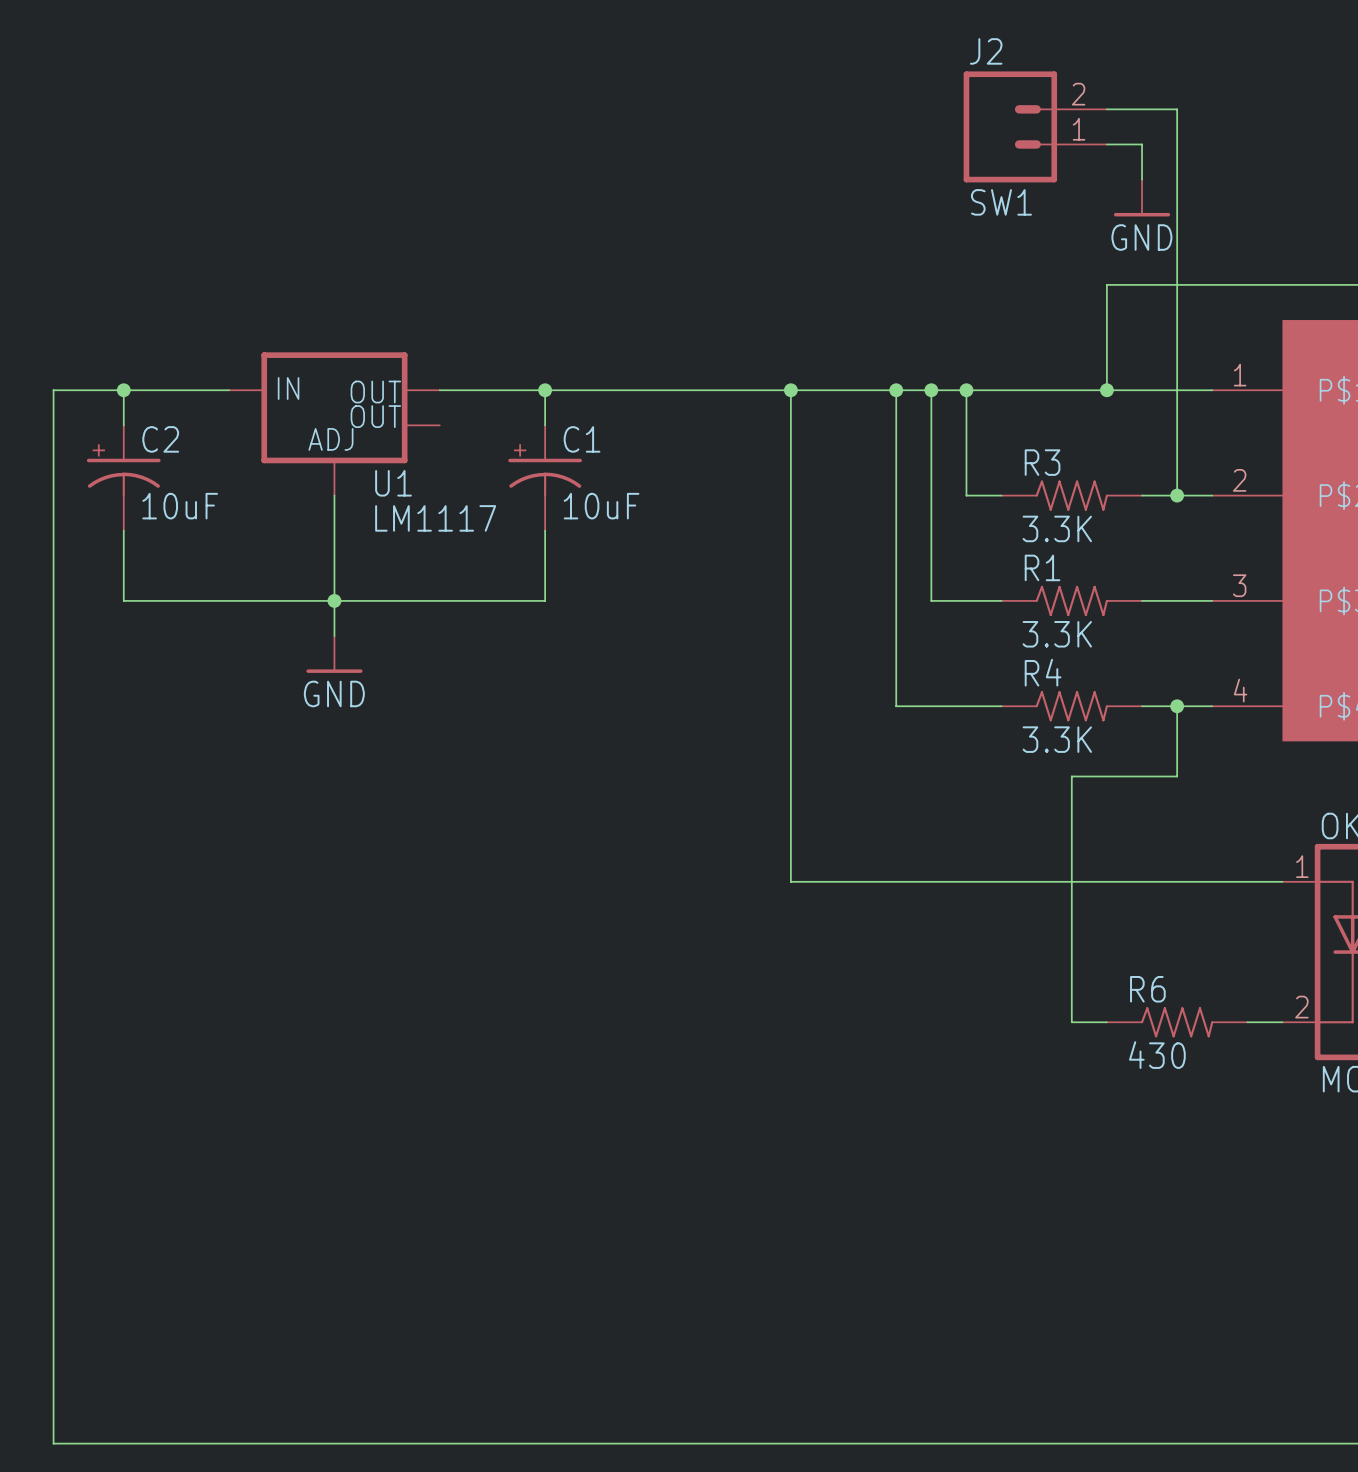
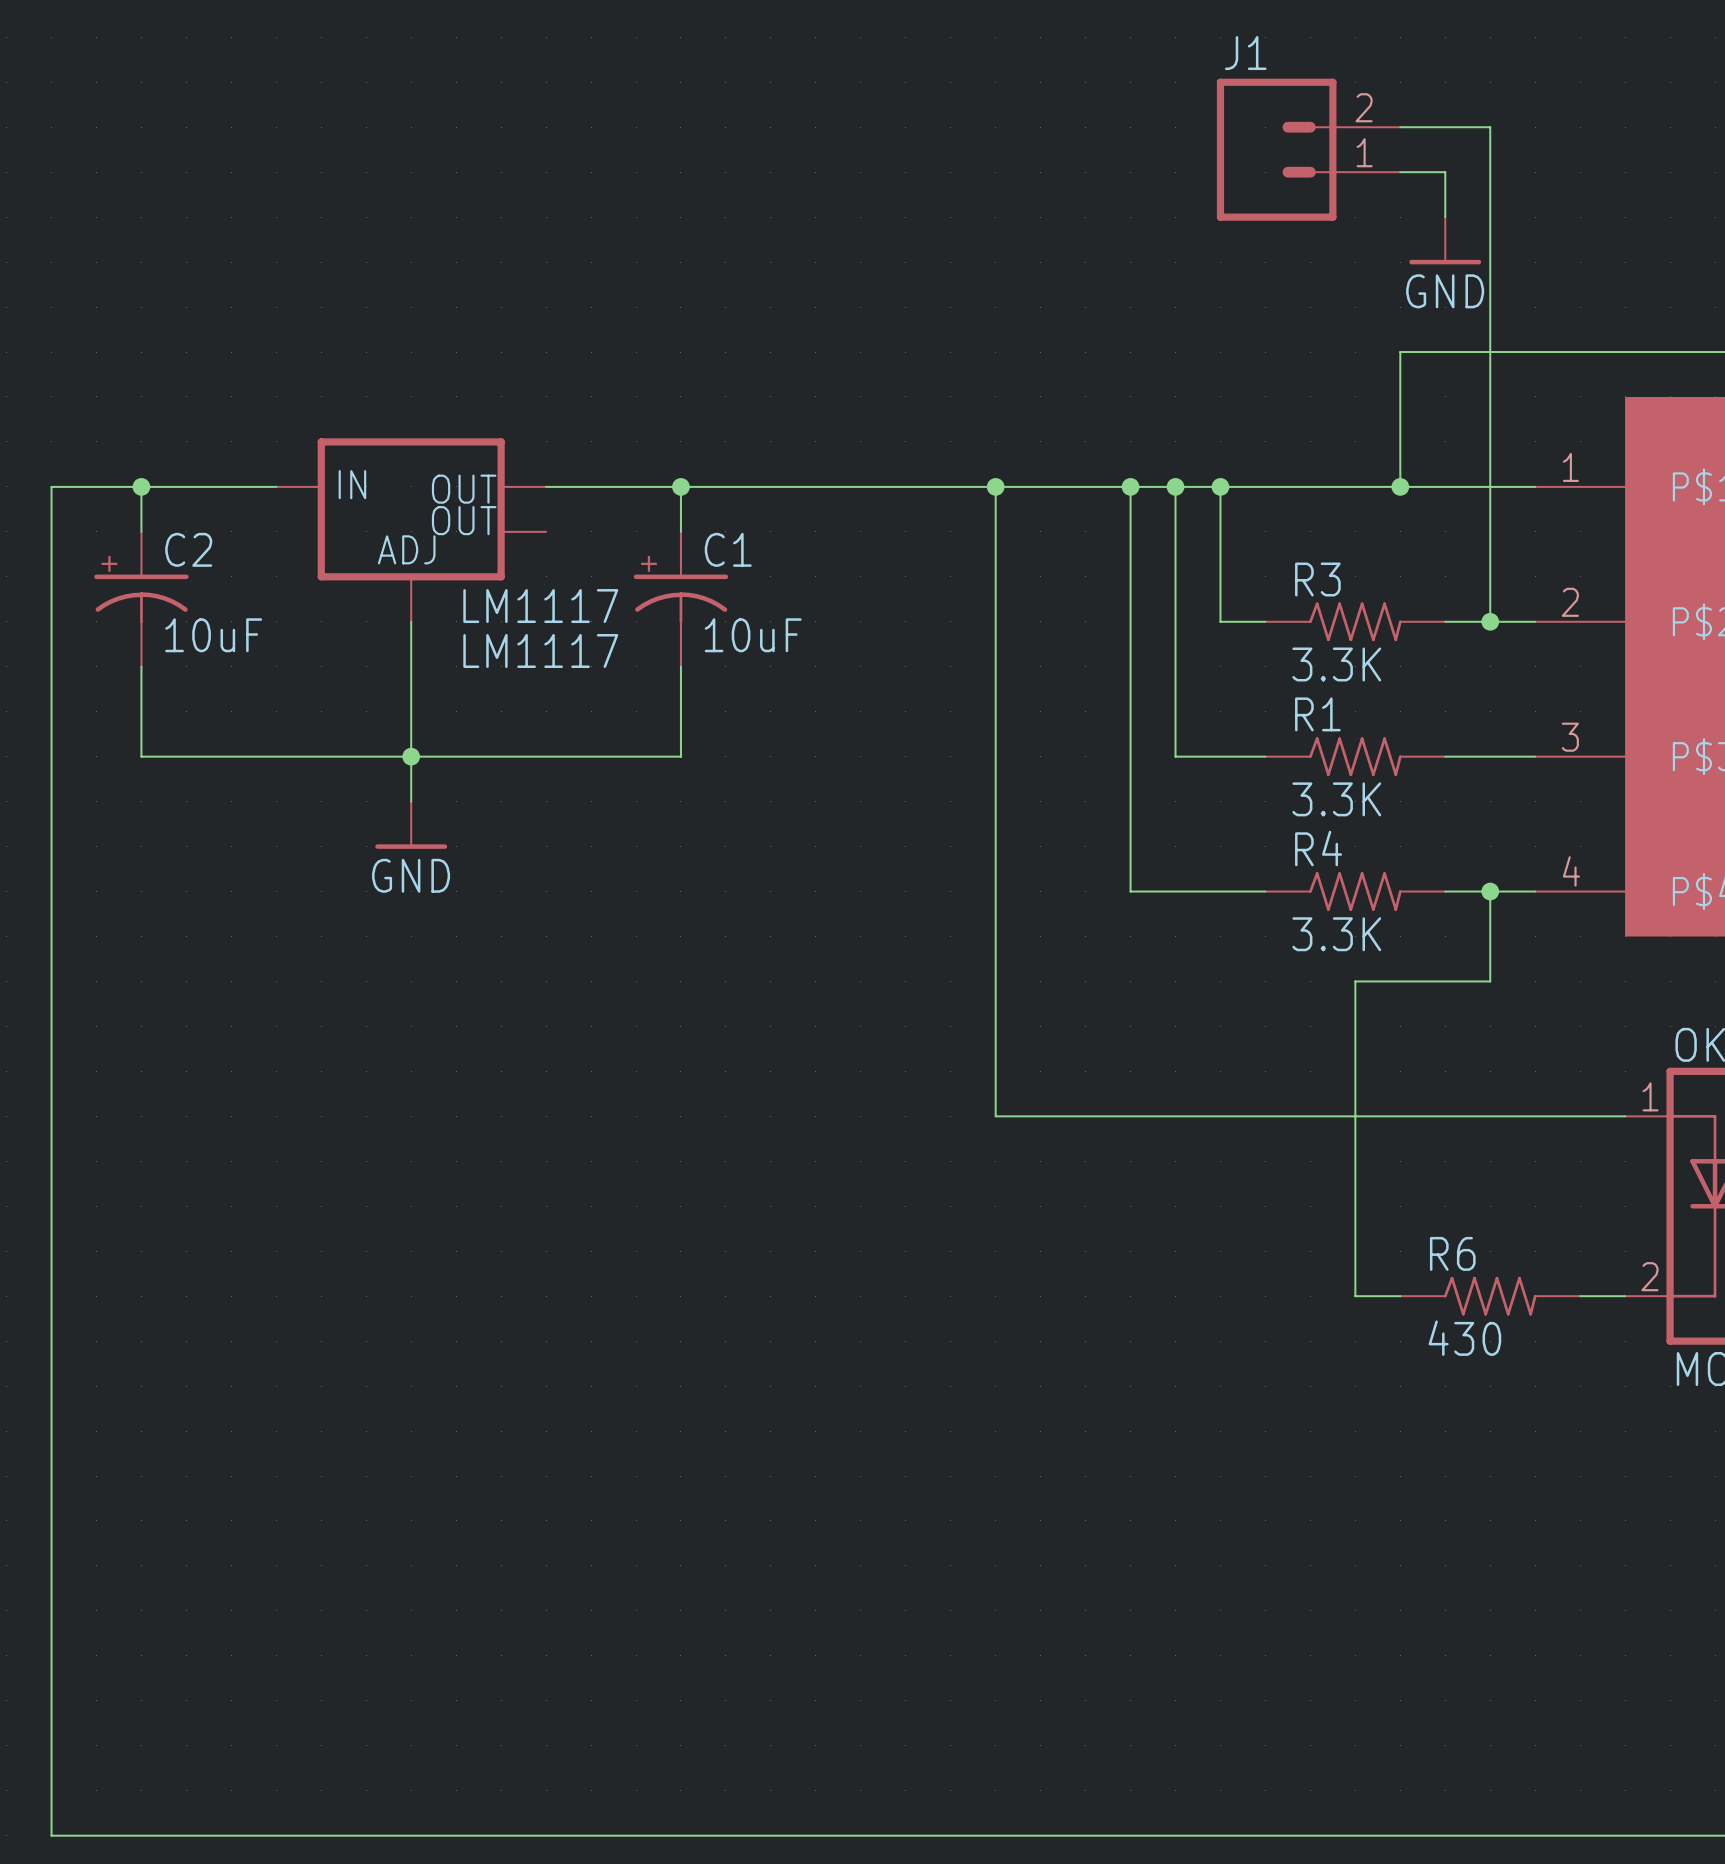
J2 name: J2 (986, 51) -> J1 (1245, 53)
J2 value: SW1 (1001, 202) -> none
U1 name: U1 (393, 483) -> LM1117 (540, 606)

